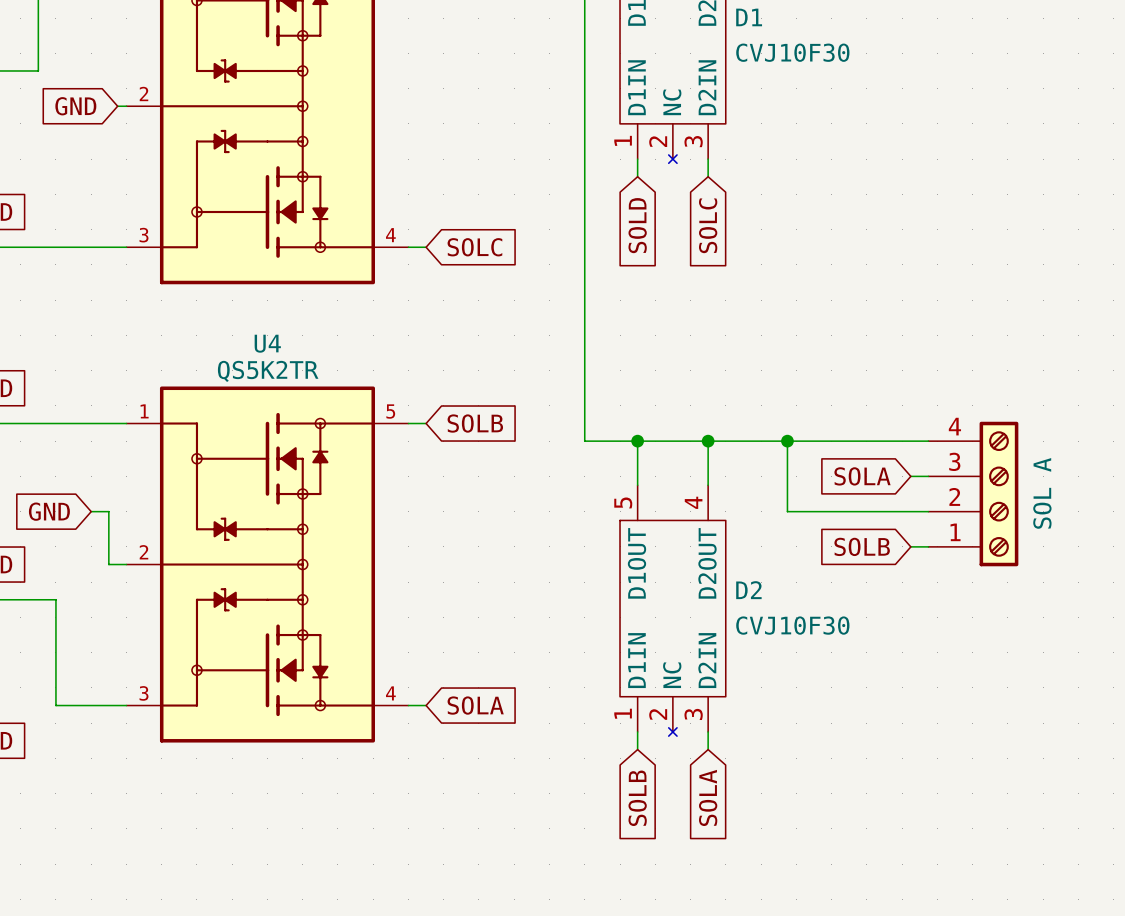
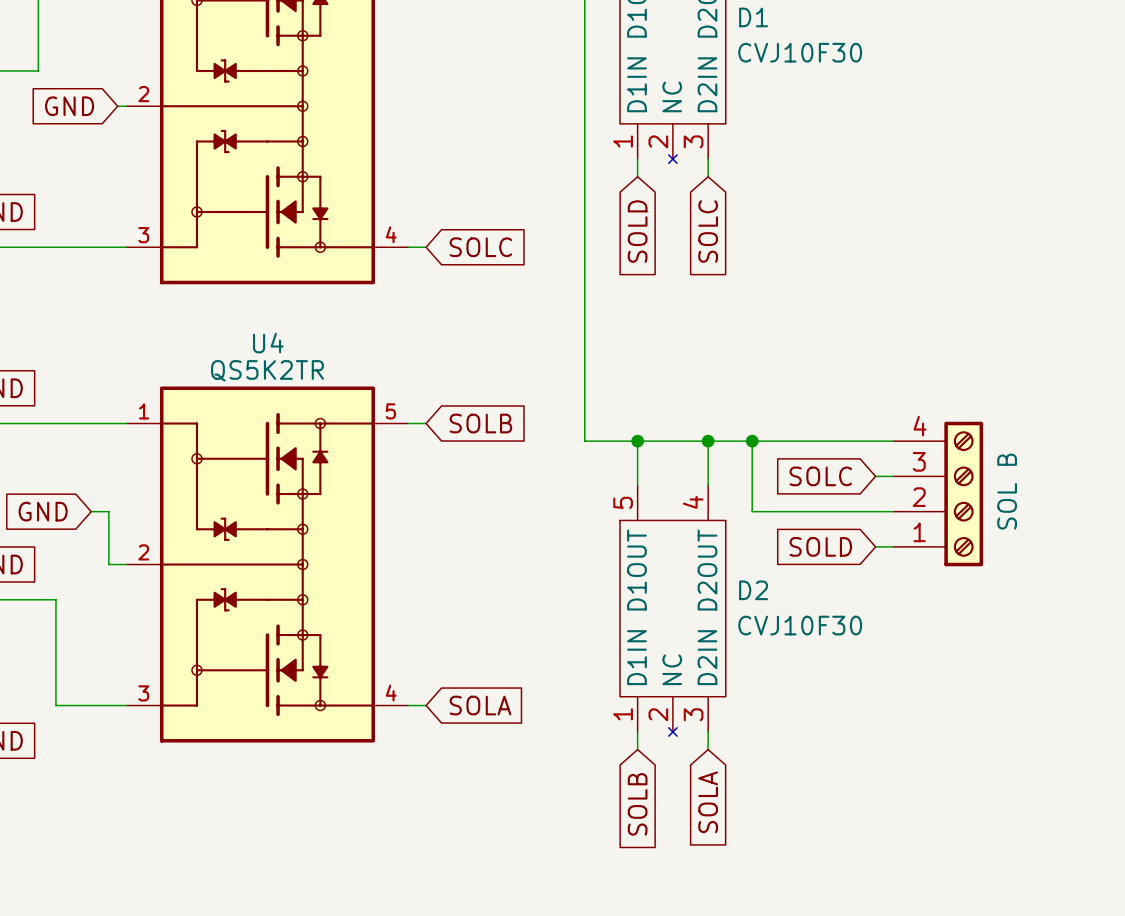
wire: (787, 441) (787, 511) -> (752, 441) (752, 511) (787, 511)
junction position: (787, 441) -> (752, 441)
global label: SOLA (862, 476) -> SOLC (820, 476)
part: none -> SOL B (938, 494)
part: SOL A (973, 494) -> none
global label: SOLB (862, 546) -> SOLD (820, 546)

